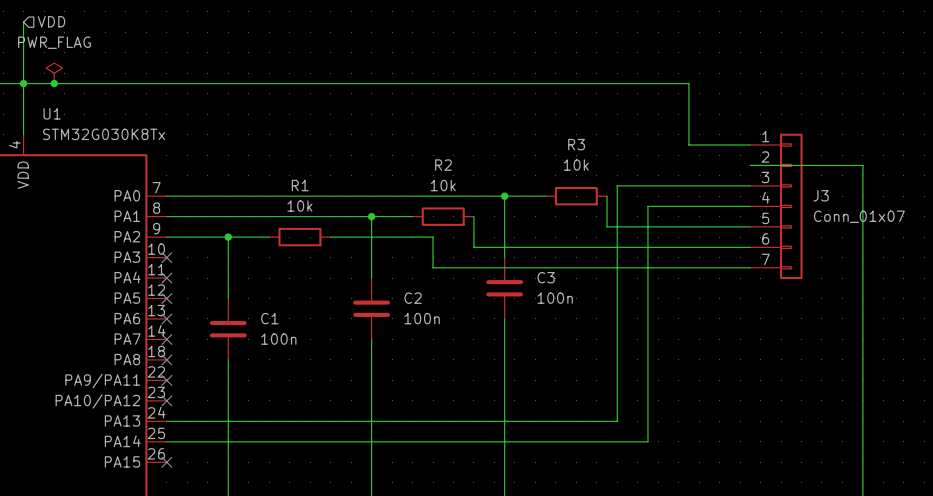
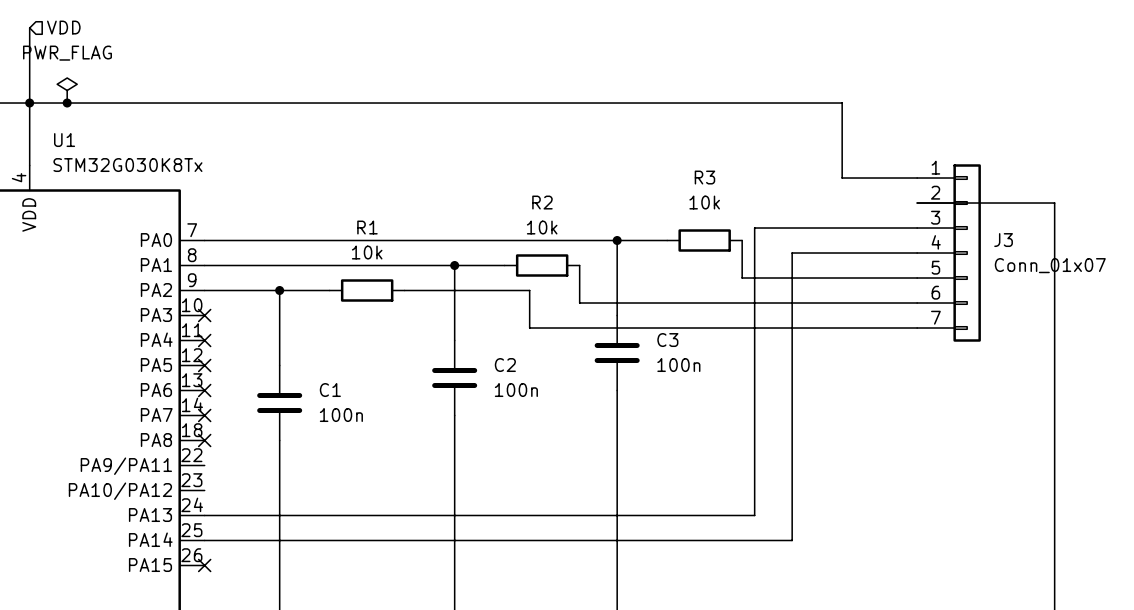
no-connect mark: (166, 380) -> none
no-connect mark: (166, 400) -> none

